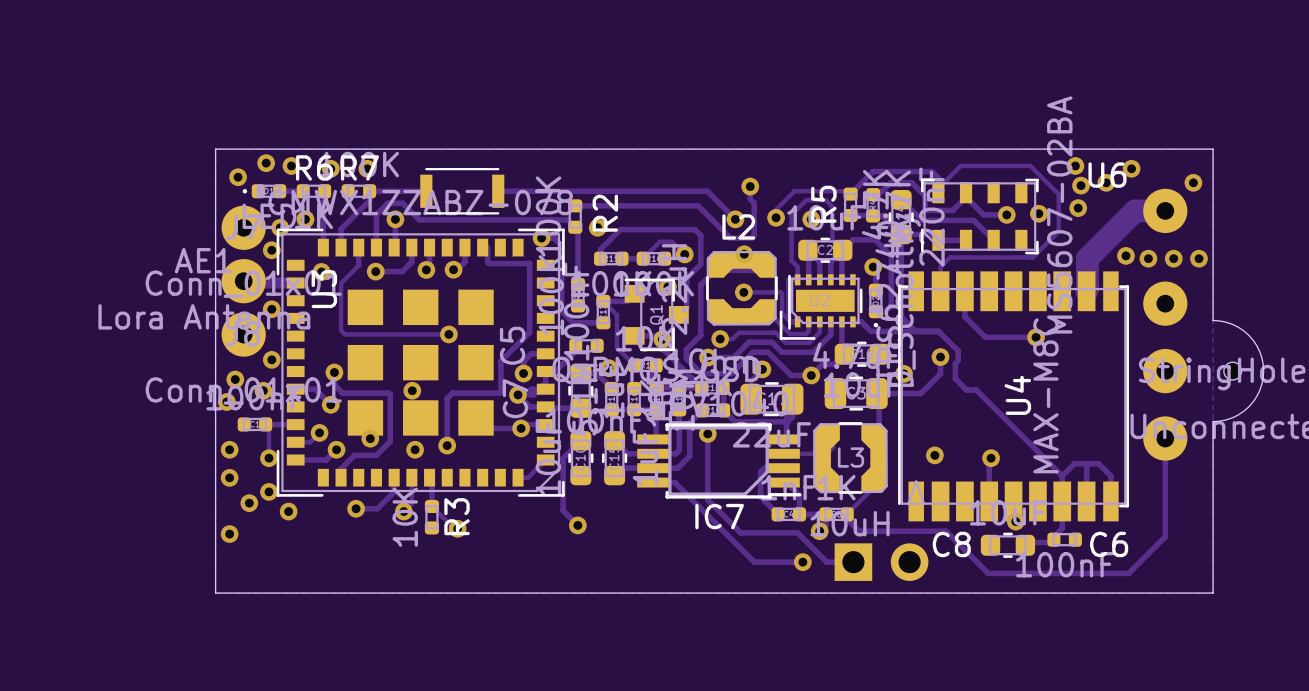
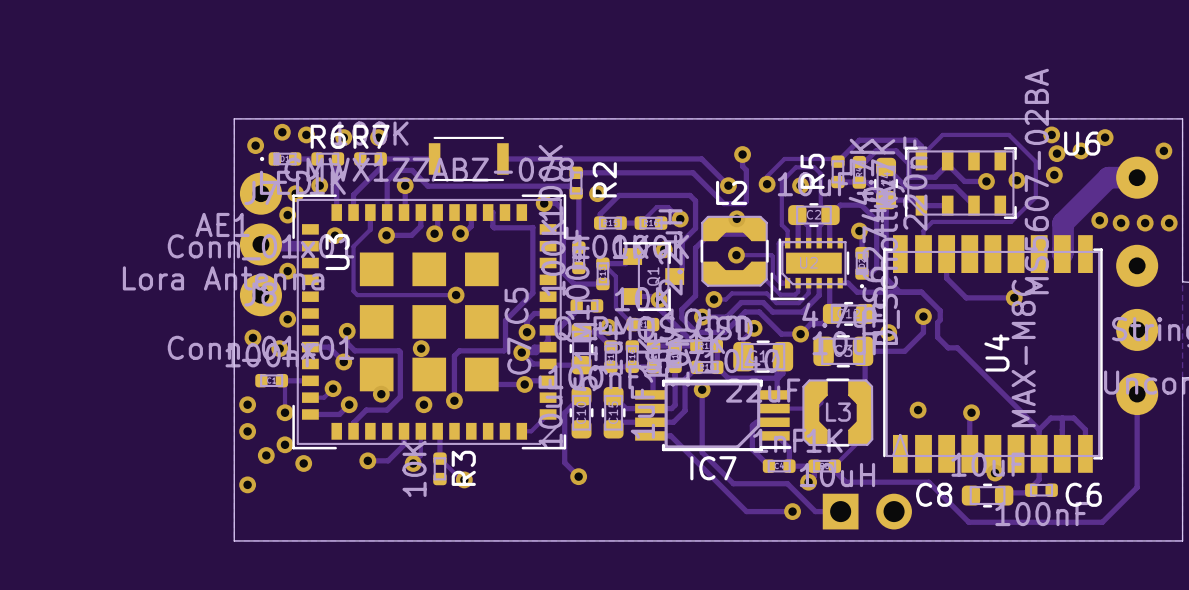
via: (226, 401) -> none

